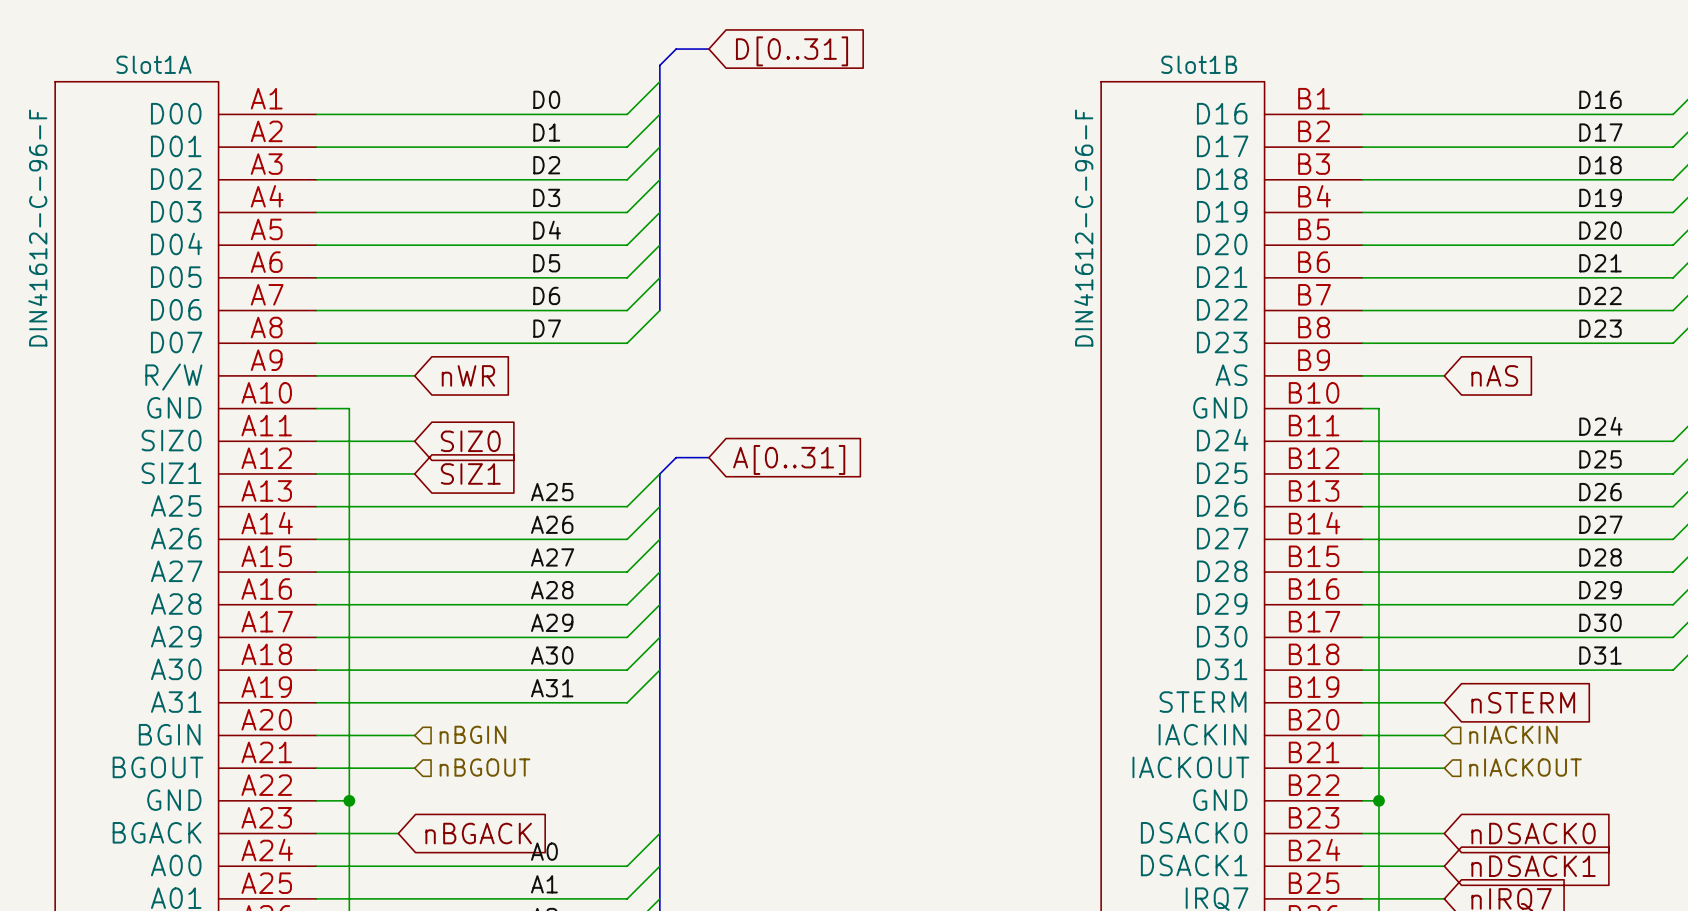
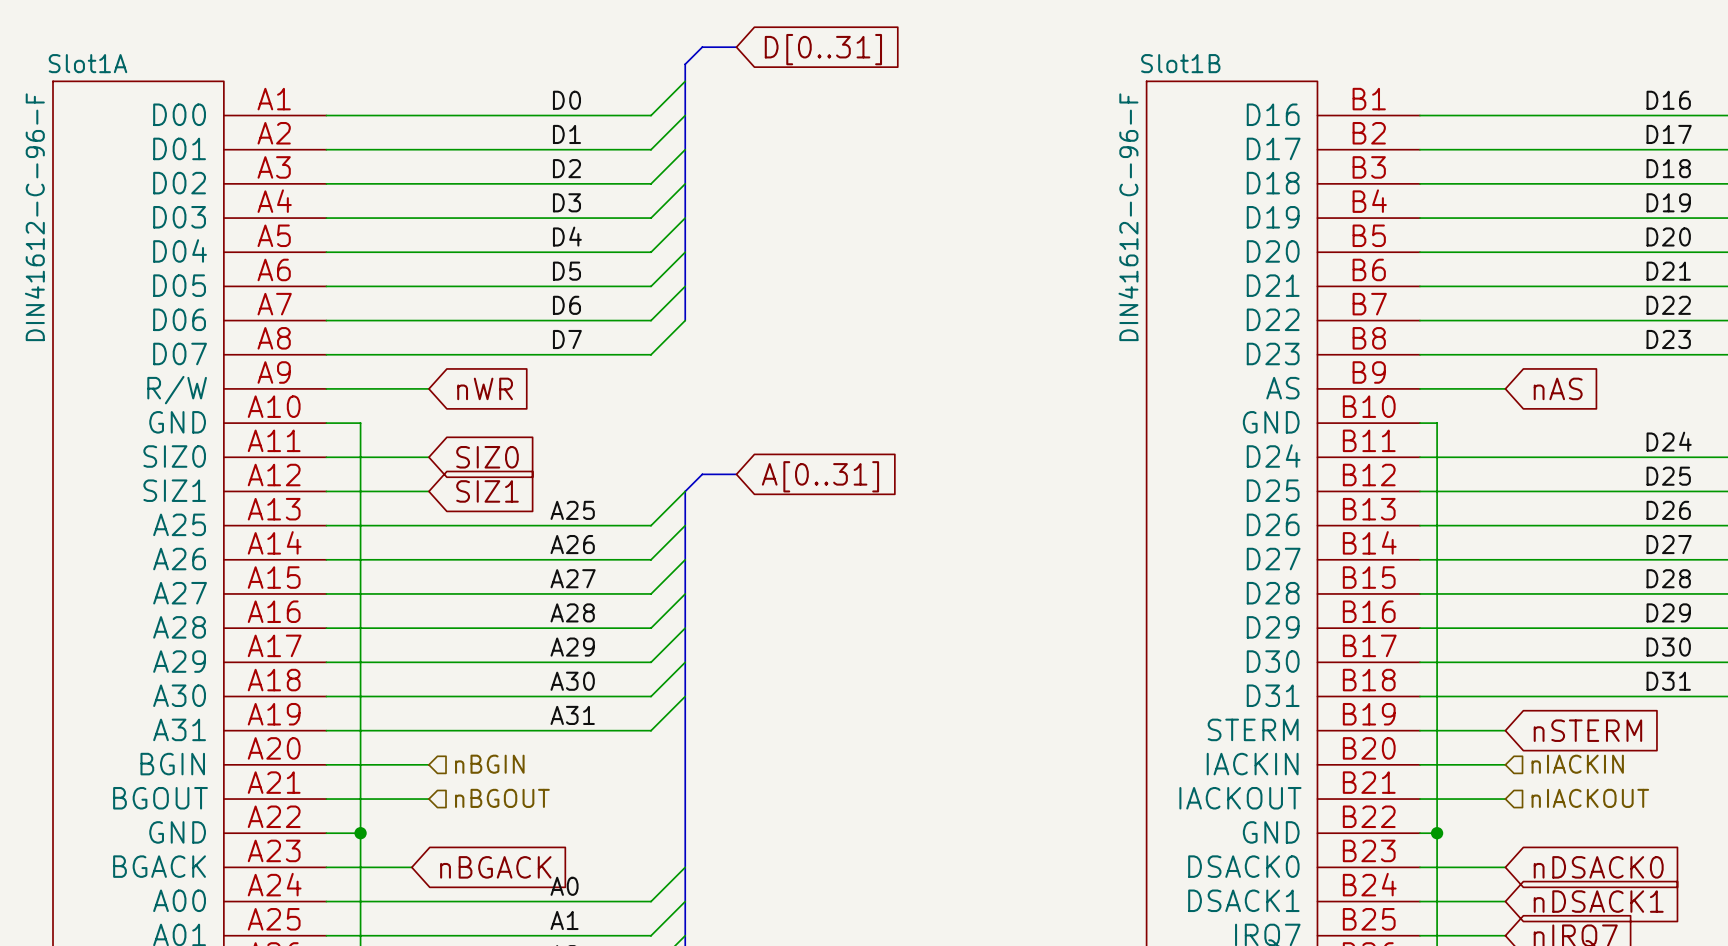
Slot1A name position: Slot1A (153, 64) -> Slot1A (87, 63)
Slot1B name position: Slot1B (1199, 64) -> Slot1B (1180, 63)
Slot1A value position: DIN41612-C-96-F (37, 228) -> DIN41612-C-96-F (34, 217)
Slot1B value position: DIN41612-C-96-F (1083, 228) -> DIN41612-C-96-F (1128, 217)

